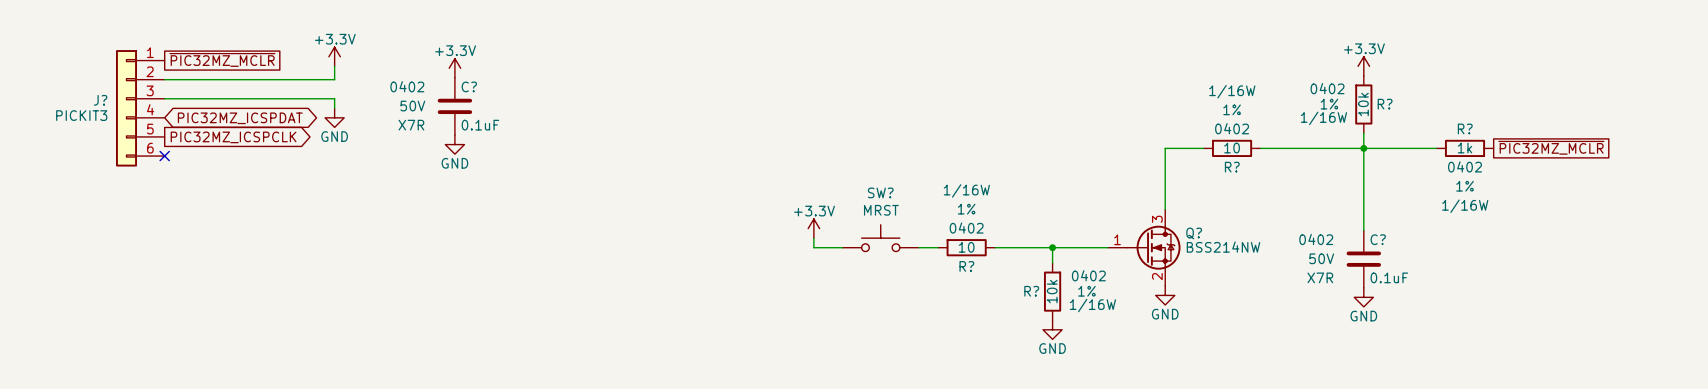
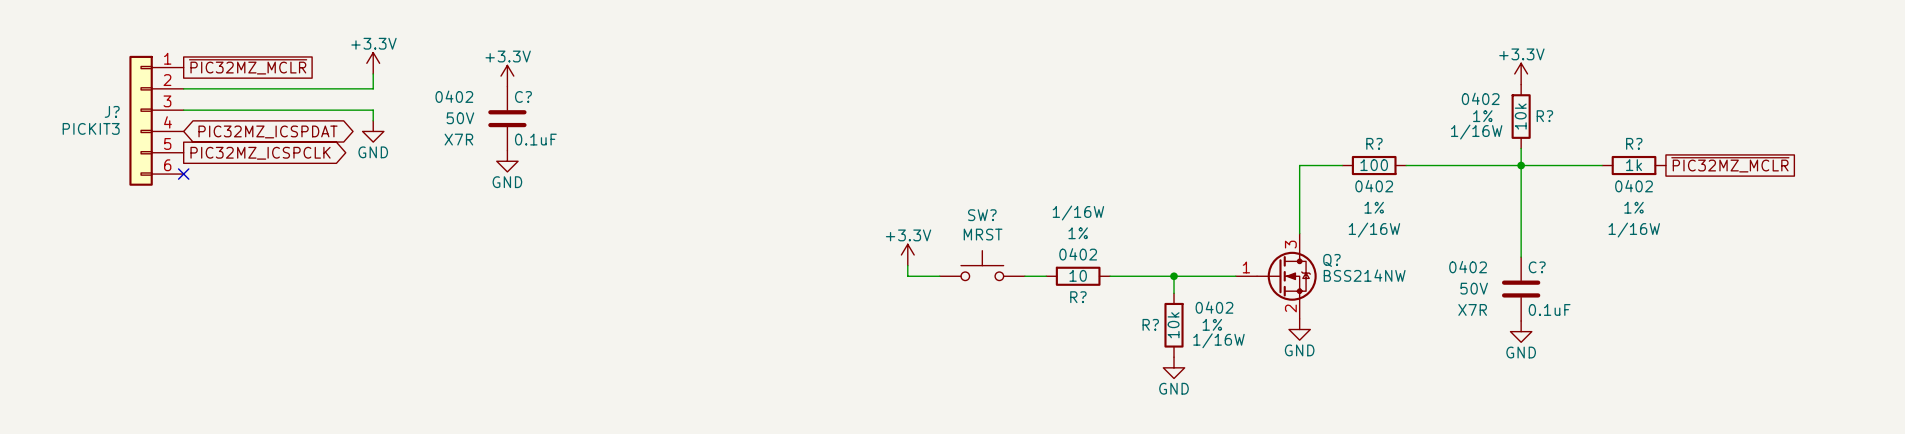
R? text position: 1/16W (1232, 91) -> 1/16W (1374, 230)
R? text position: 1% (1232, 109) -> 1% (1374, 207)
R? text position: 0402 (1232, 128) -> 0402 (1374, 186)
R? value: 10 (1232, 148) -> 100 (1374, 165)
R? name position: R? (1232, 167) -> R? (1374, 143)

